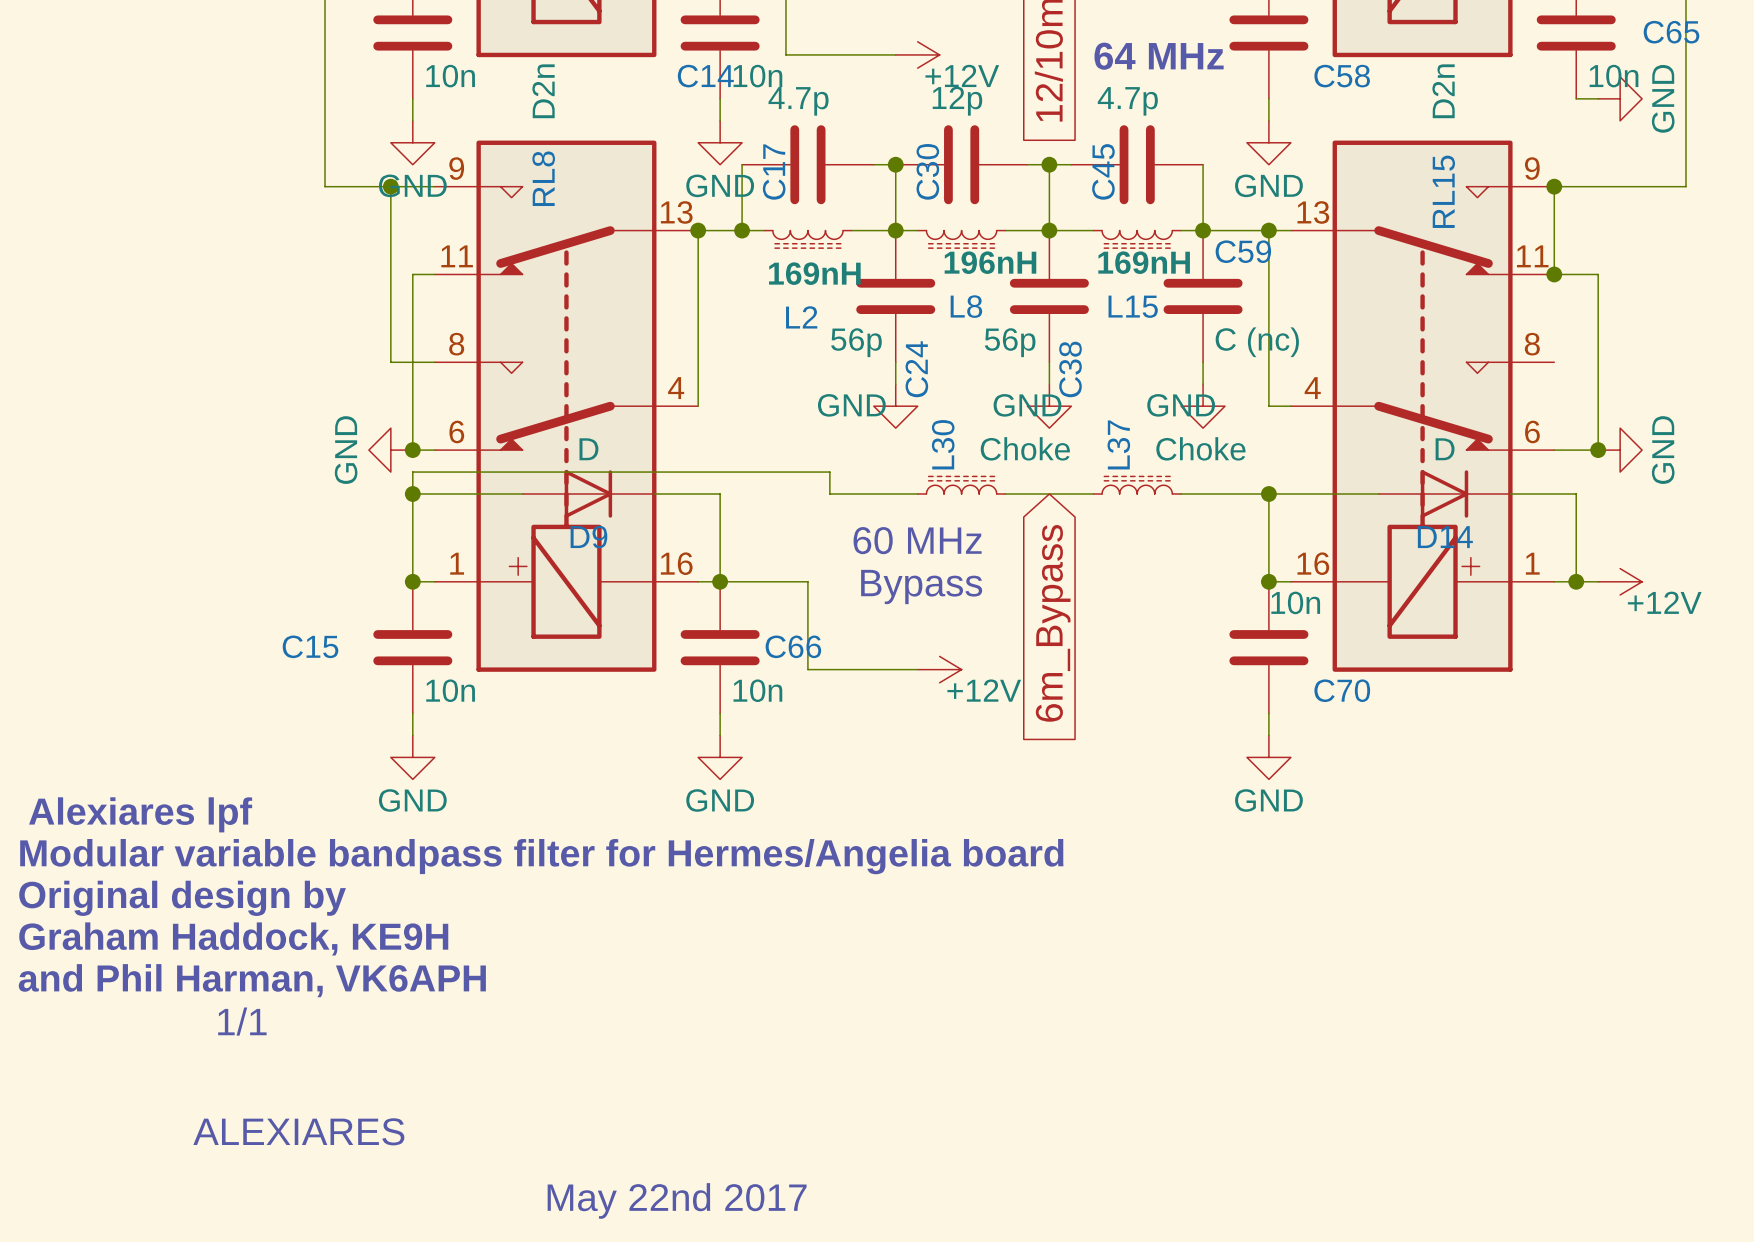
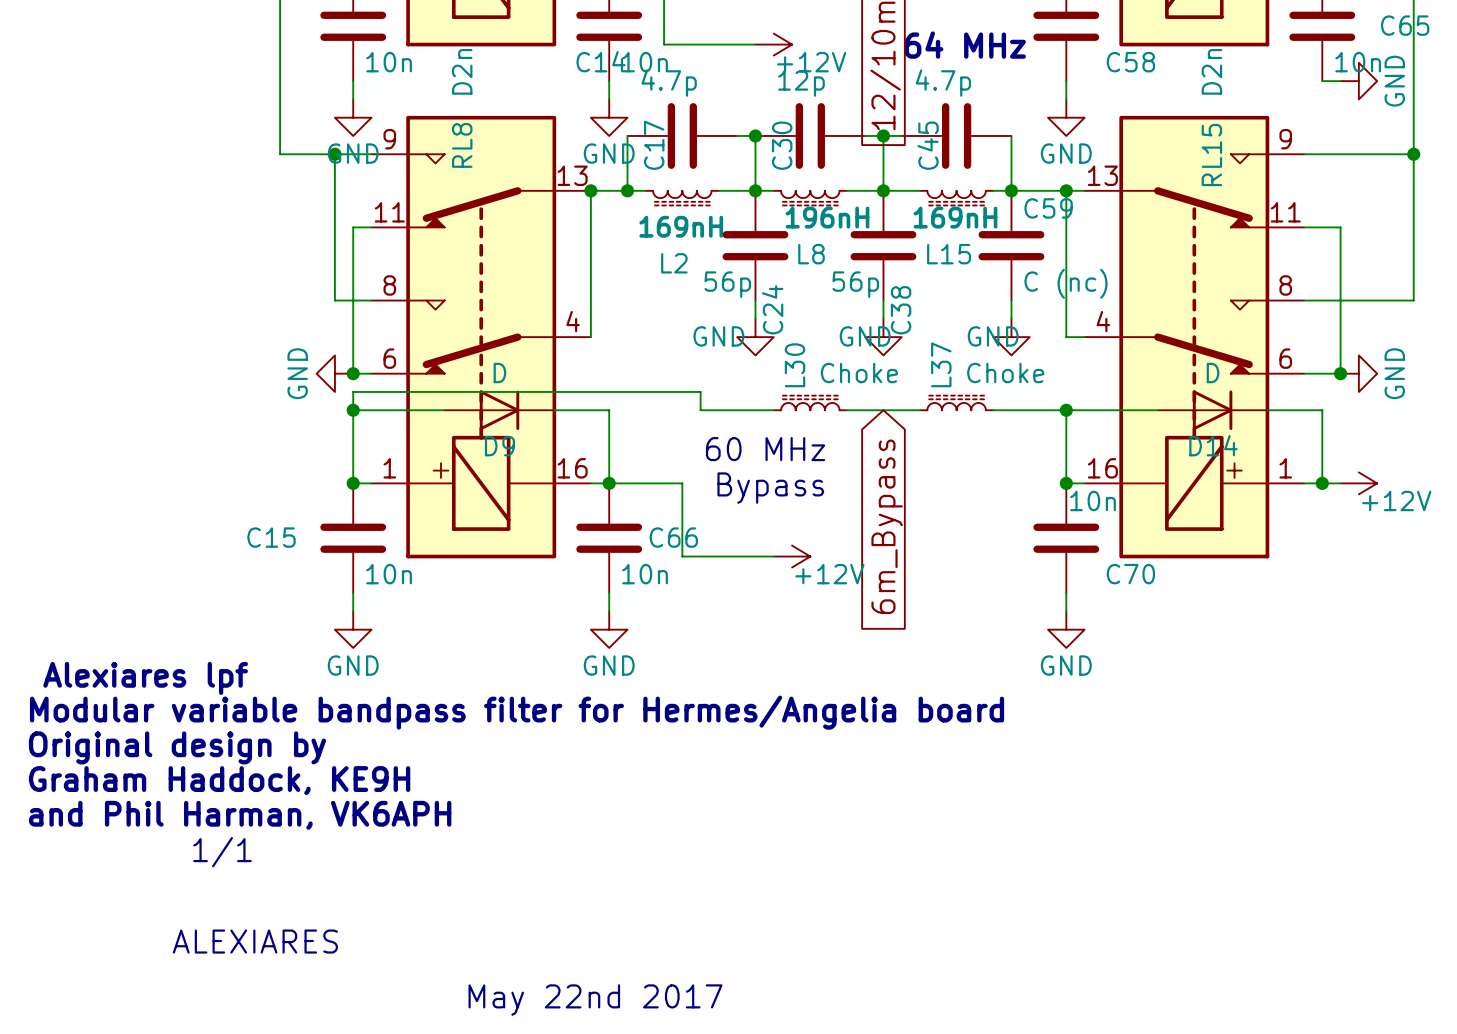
wire: (1554, 186) (1554, 274) -> none
junction: (1554, 186) -> none
wire: none -> (1413, 154) (1413, 300) (1304, 300)
junction: none -> (1413, 154)
junction: (1554, 274) -> none

